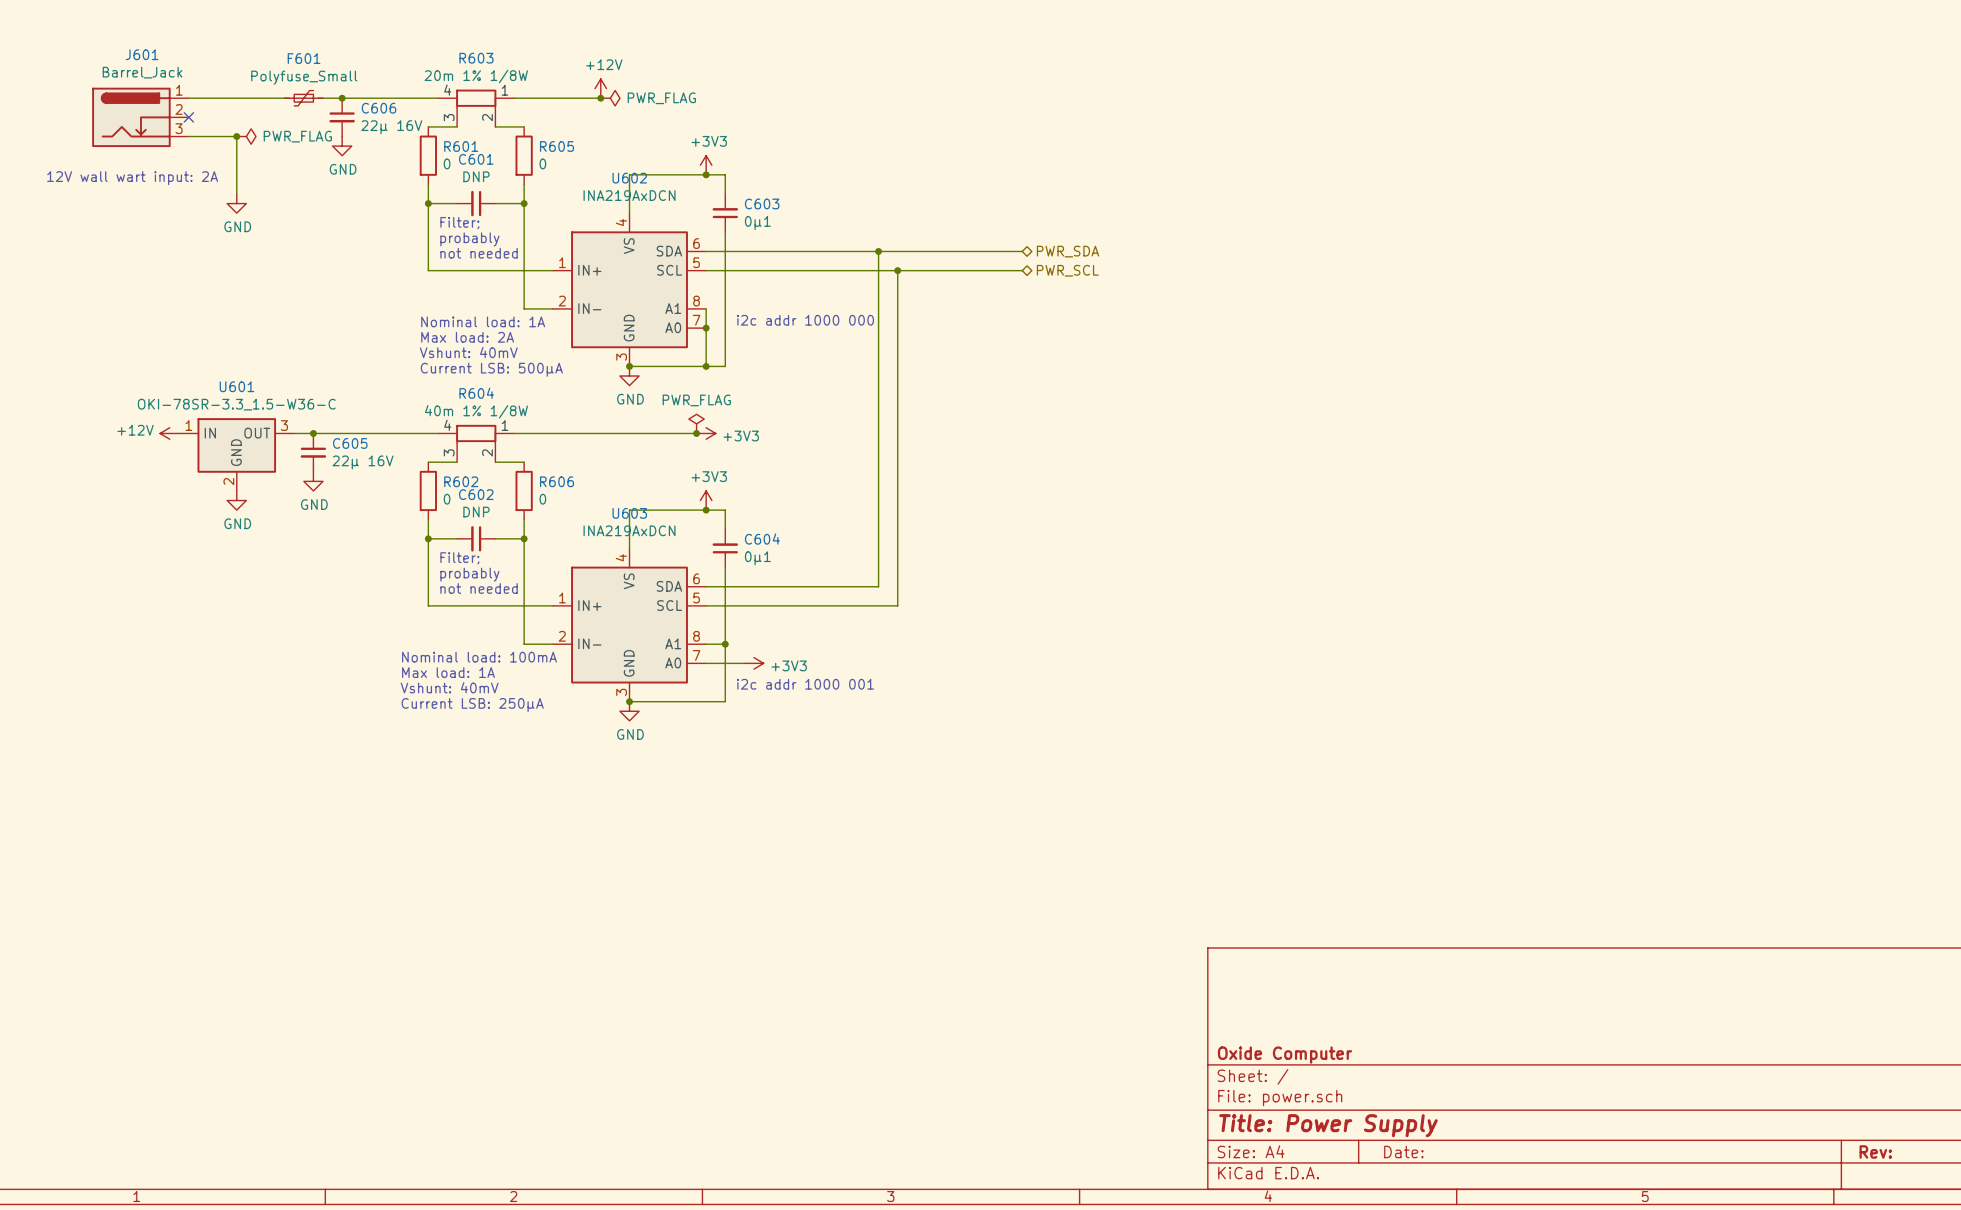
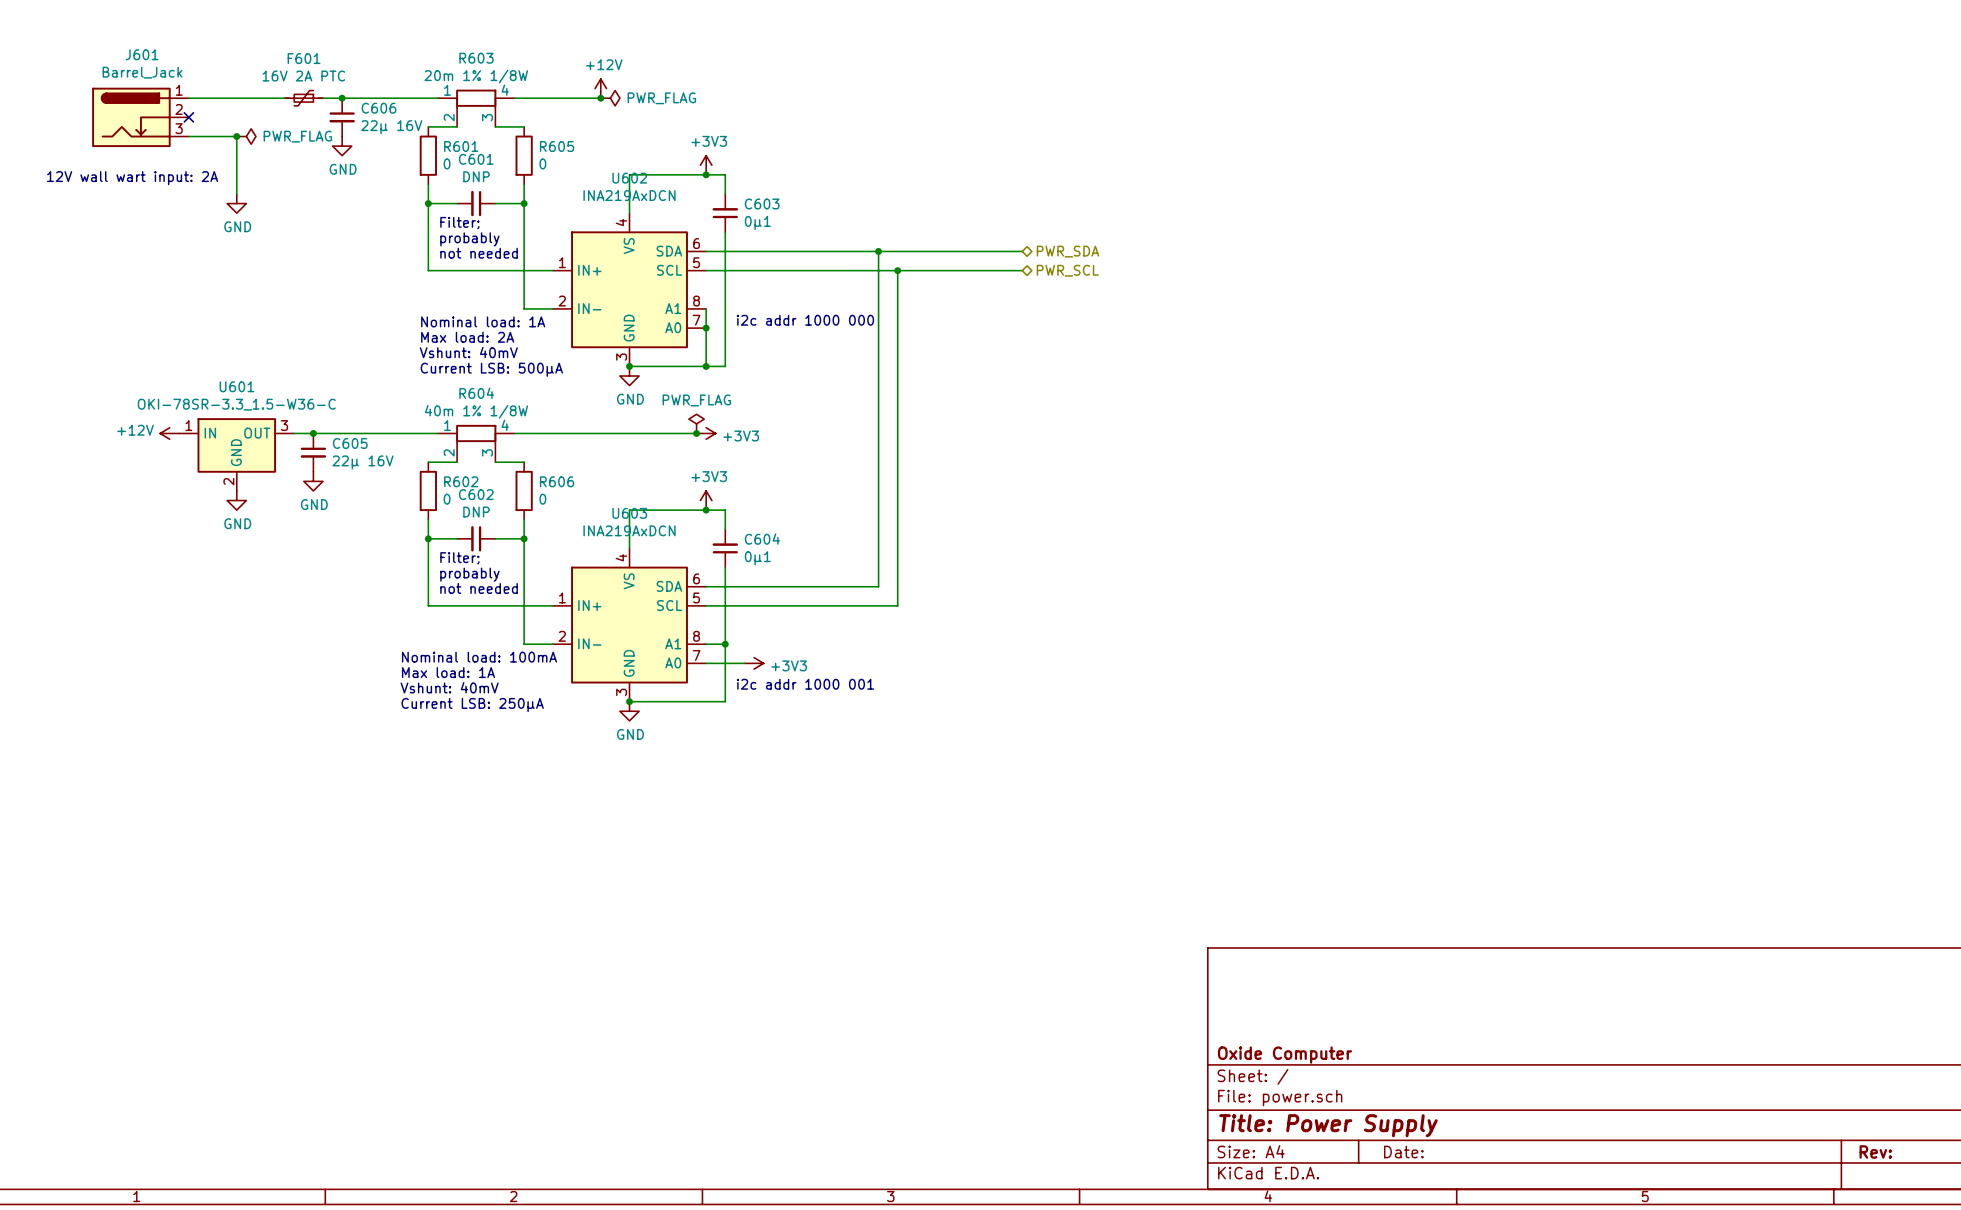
F601 value: Polyfuse_Small (304, 77) -> 16V 2A PTC (303, 76)
R603 flip: as is (476, 98) -> left-right (476, 98)
R604 flip: as is (476, 433) -> left-right (476, 433)

